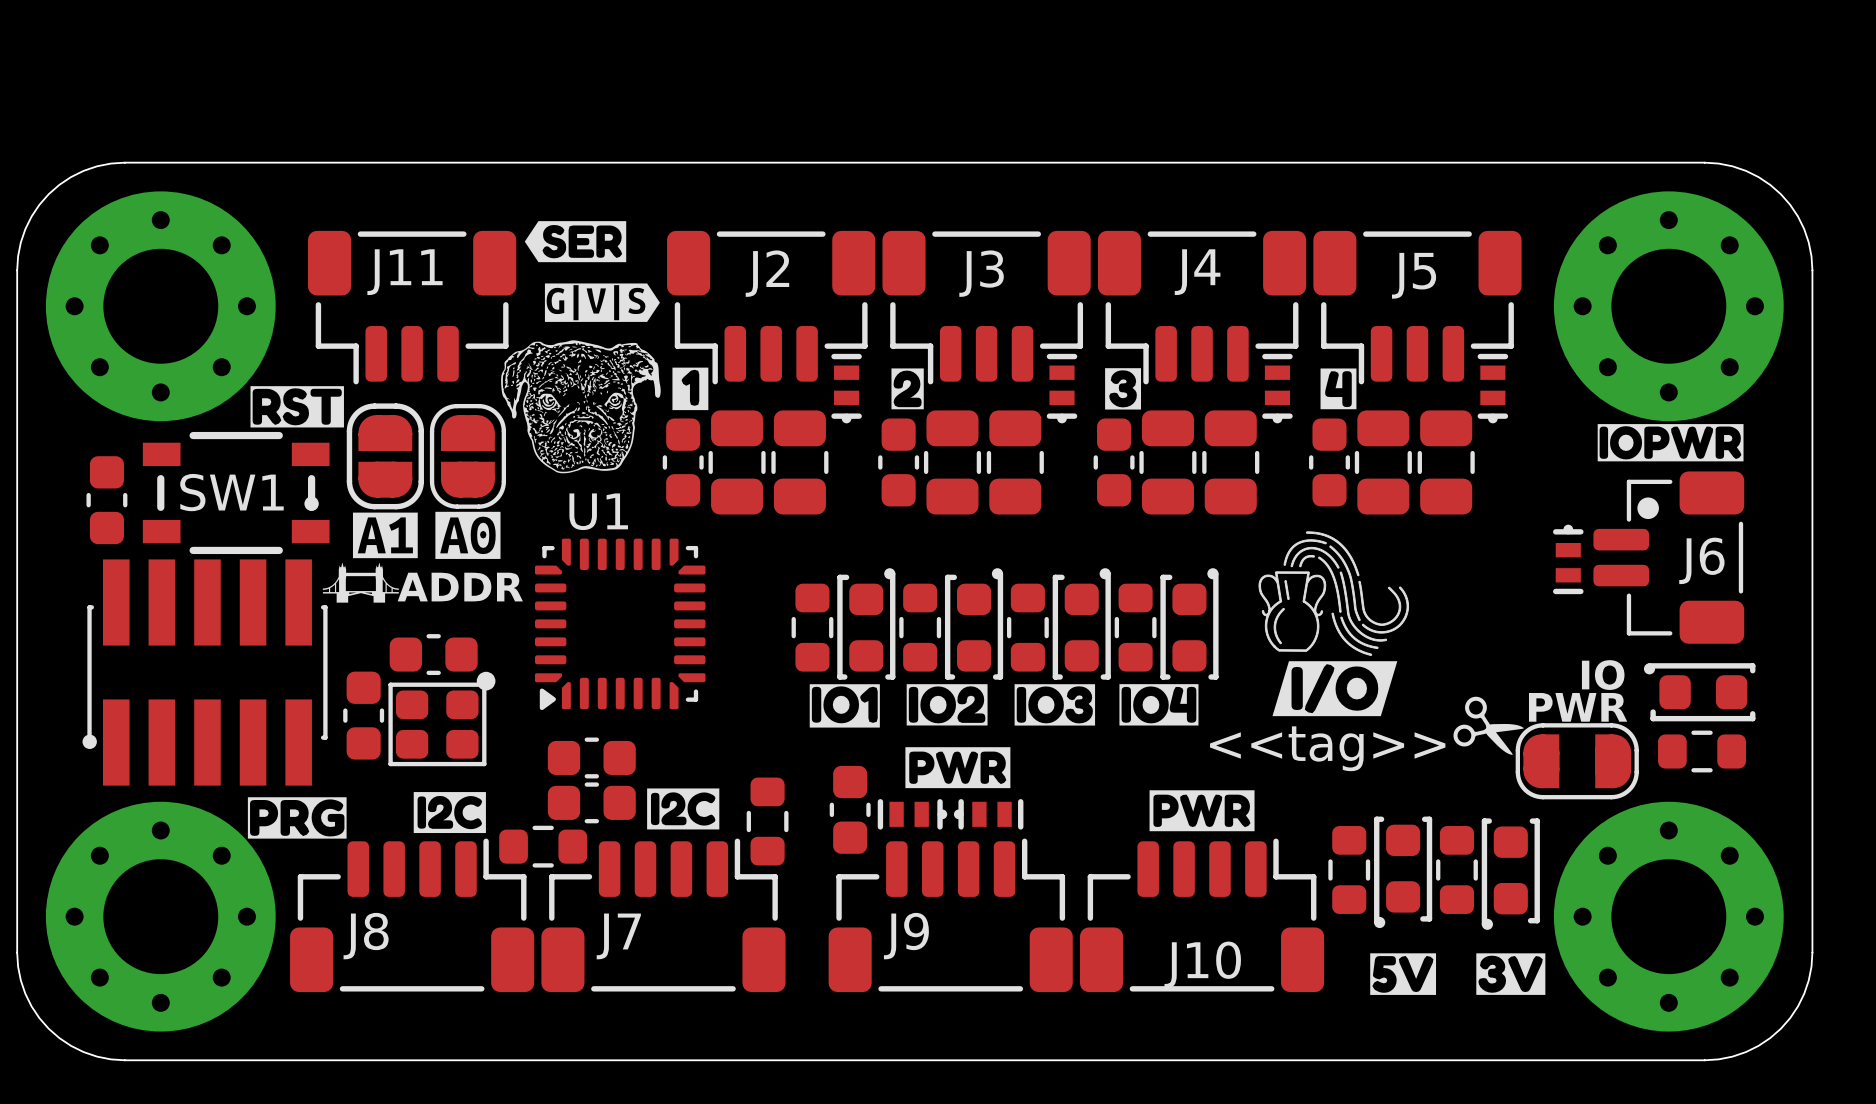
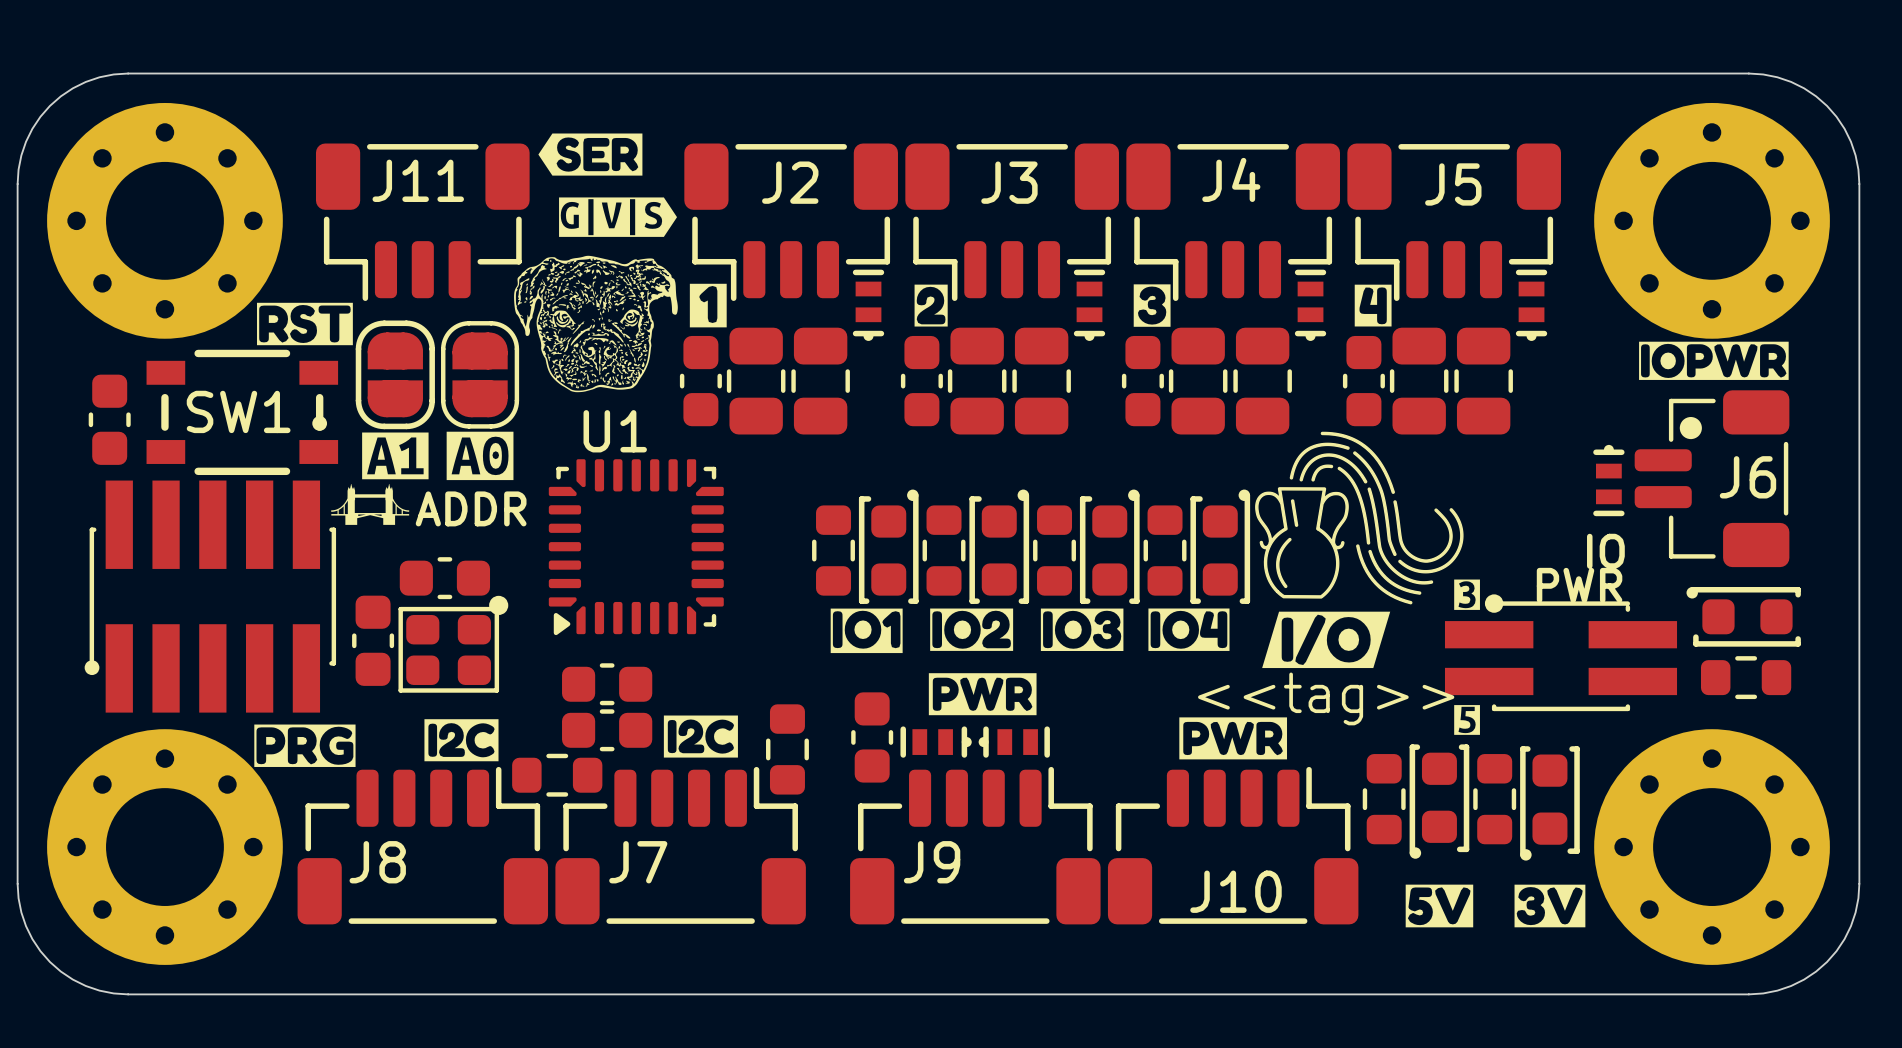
drawing shape: [1258, 531, 1410, 656] -> [1255, 431, 1464, 605]
drawing: none -> [1454, 579, 1480, 610]
text position: IO (1603, 675) -> IO (1605, 551)
drawing position: (1334, 688) -> (1326, 639)
drawing: [1453, 696, 1524, 755] -> none
text position: PWR (1578, 707) -> PWR (1579, 585)
part: none -> (1561, 652)
text position: <<tag>> (1327, 748) -> <<tag>> (1326, 698)
part: (1577, 761) -> none
drawing: none -> [1454, 705, 1480, 735]

